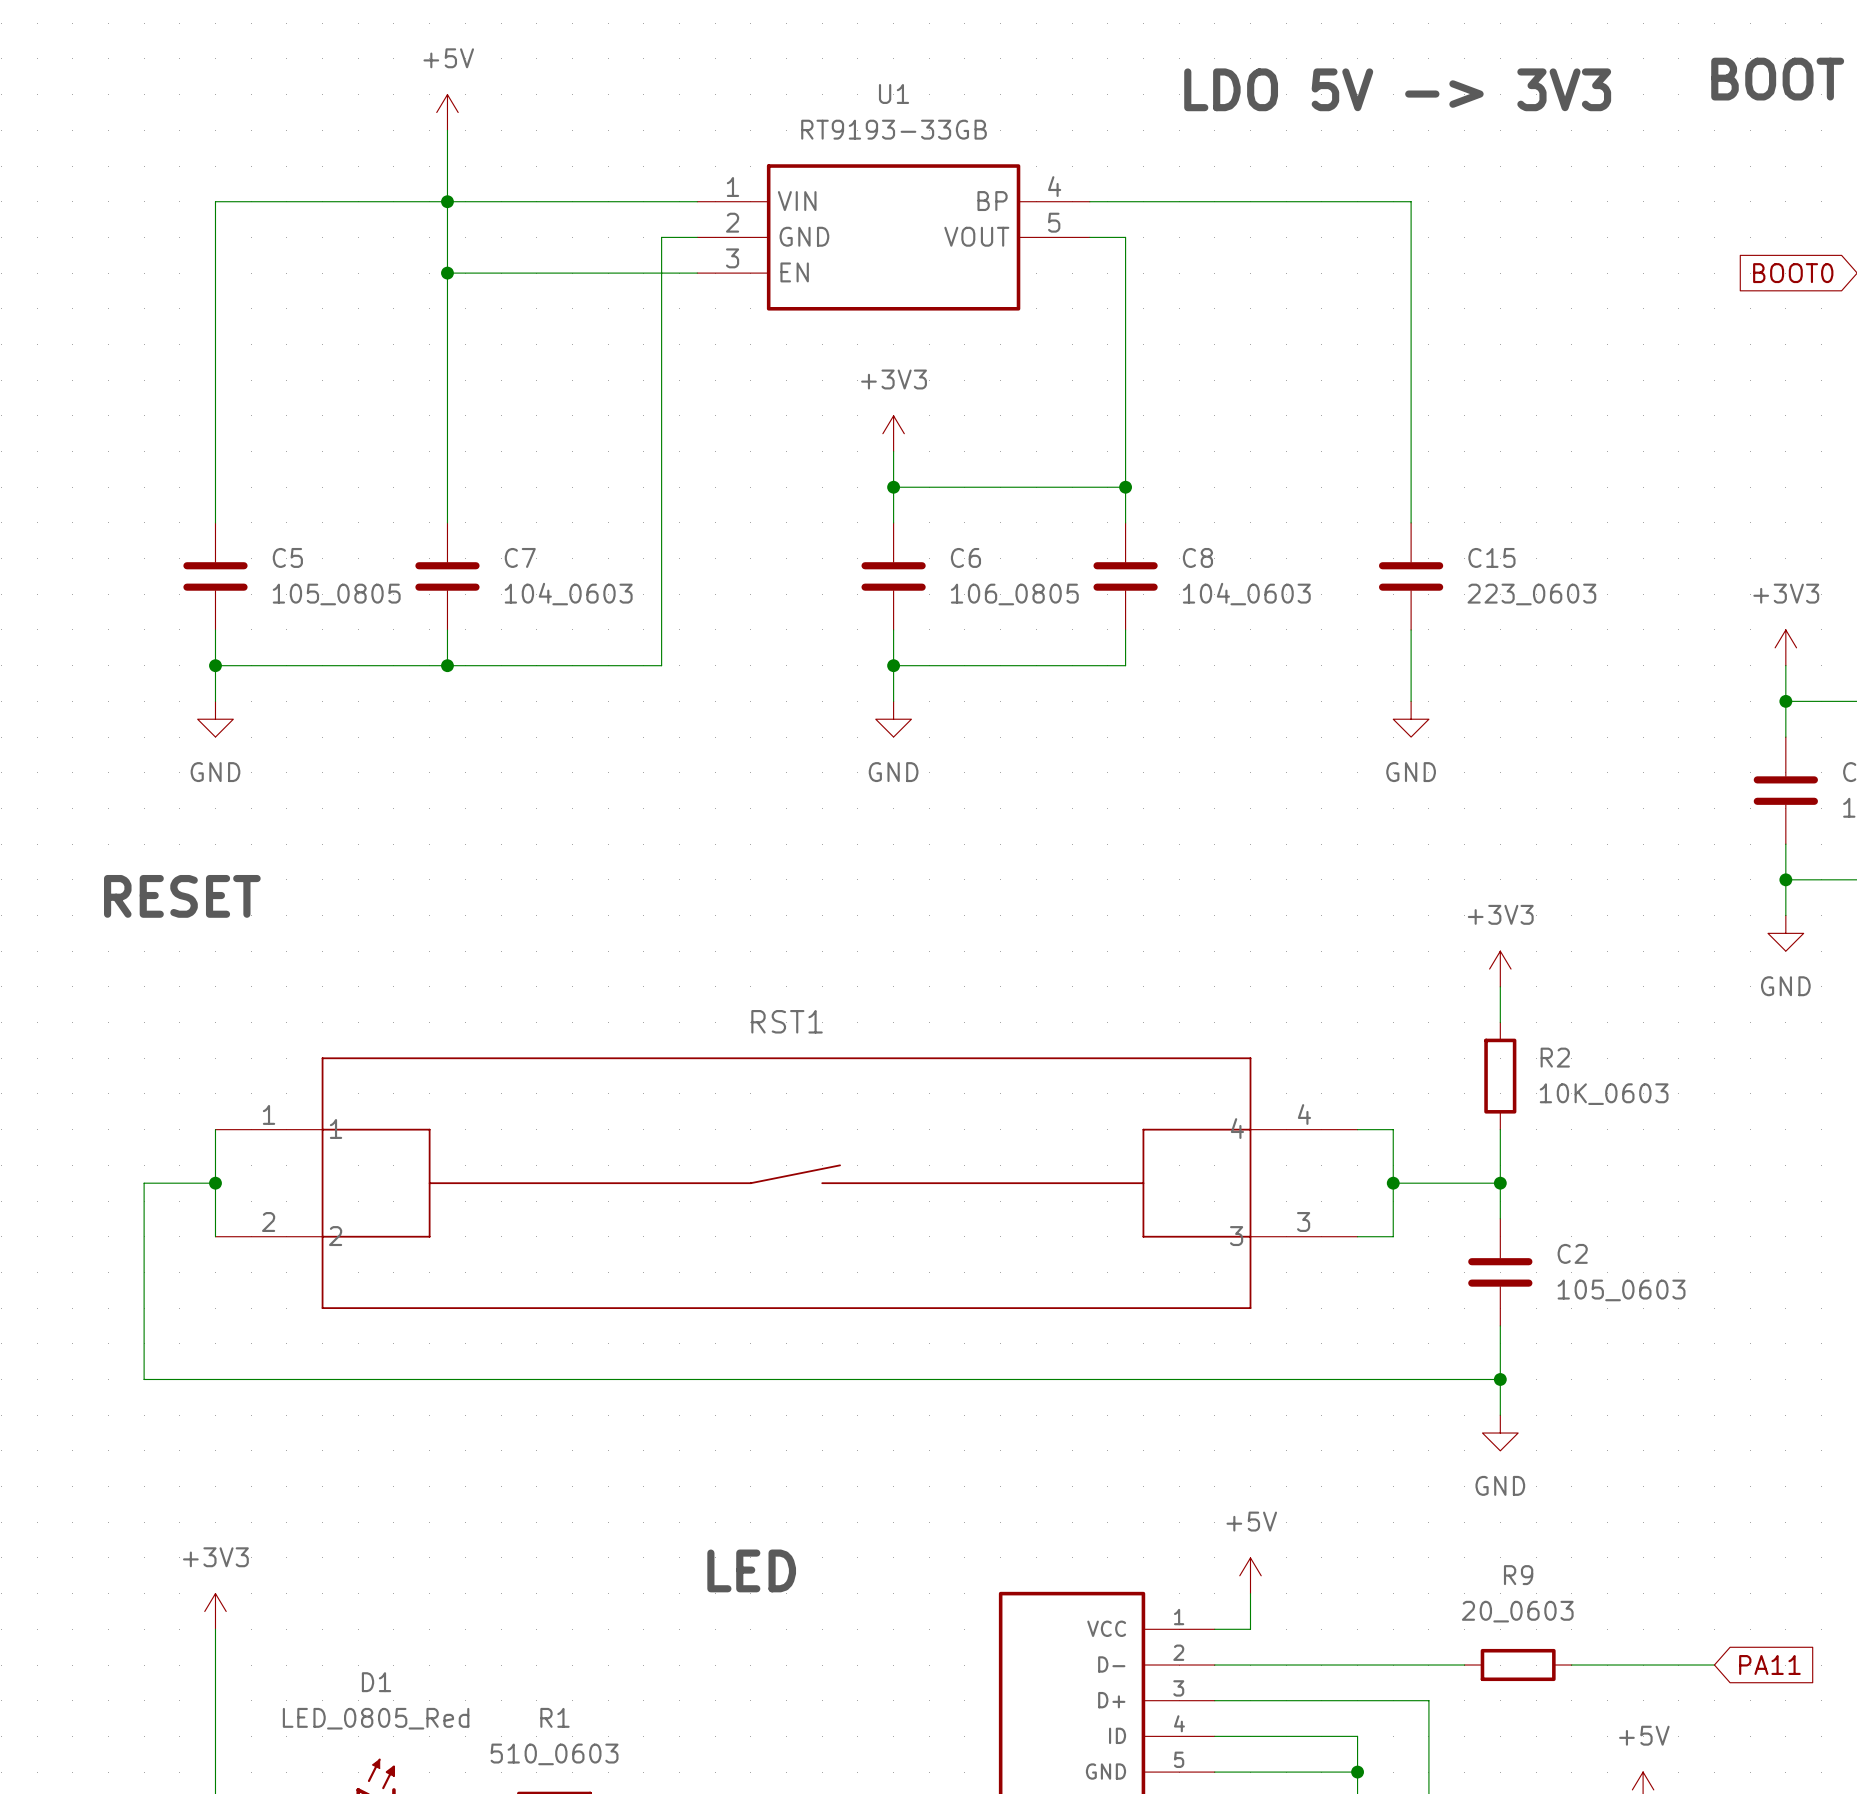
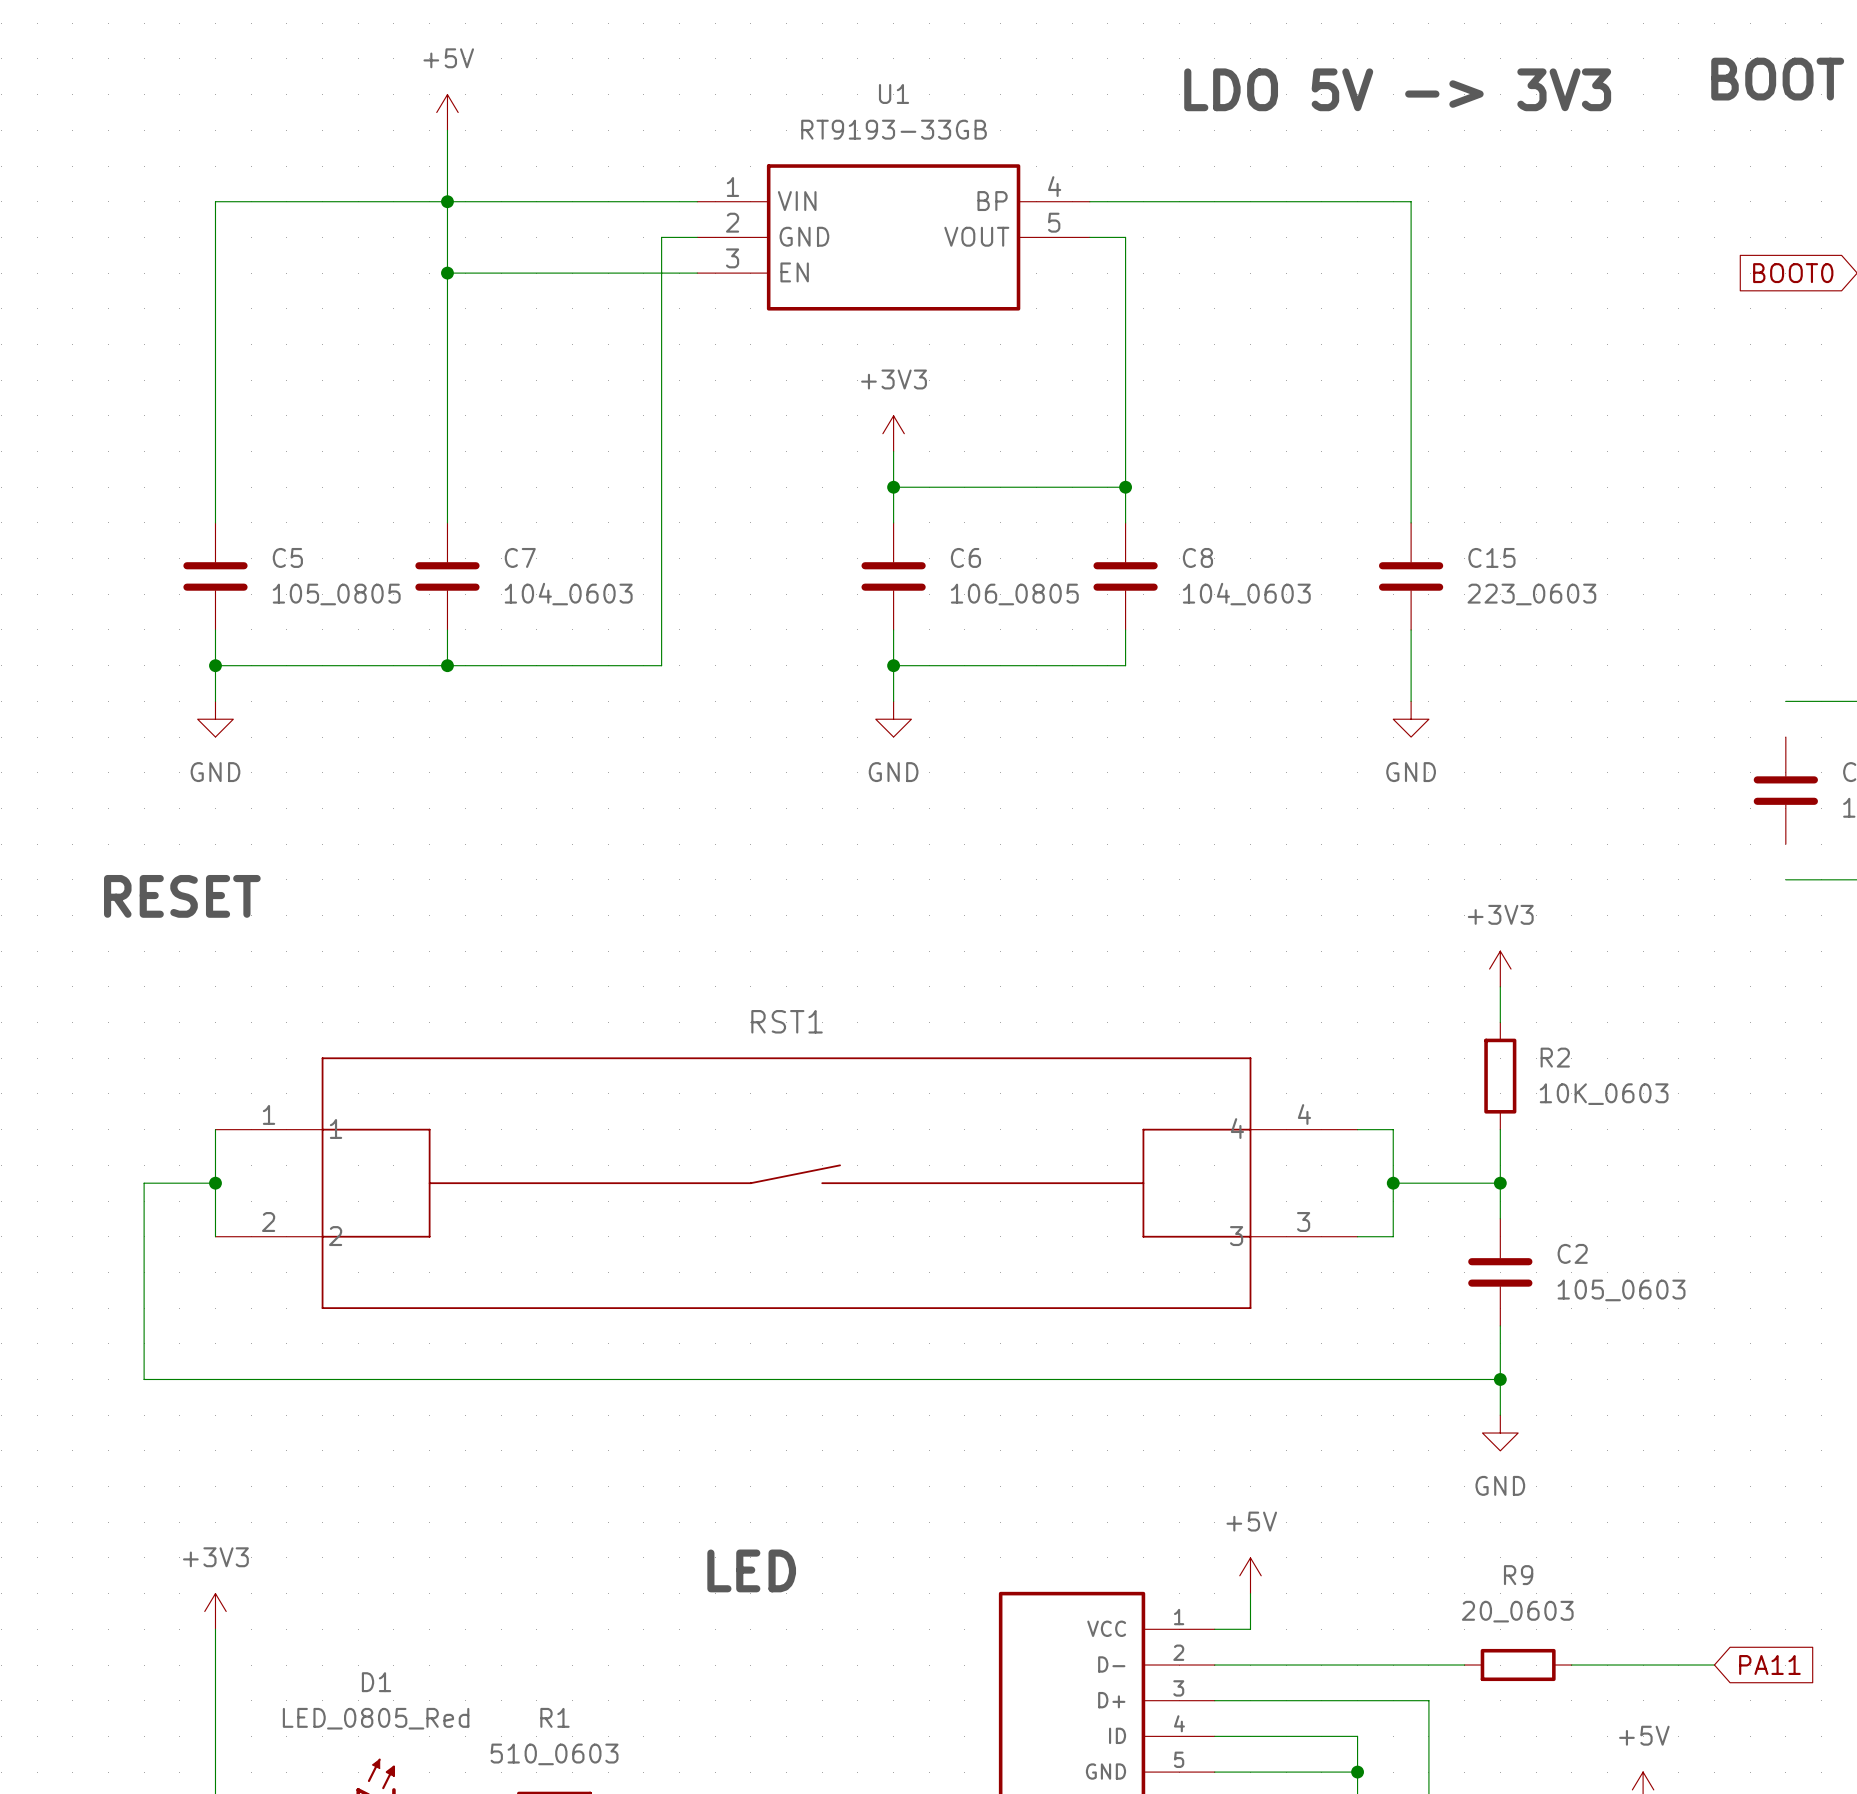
power symbol: +3V3 (1785, 647) -> none
wire: (1785, 665) (1785, 737) -> none
junction: (1785, 701) -> none
wire: (1785, 844) (1785, 915) -> none
junction: (1785, 879) -> none
power symbol: GND (1785, 933) -> none

